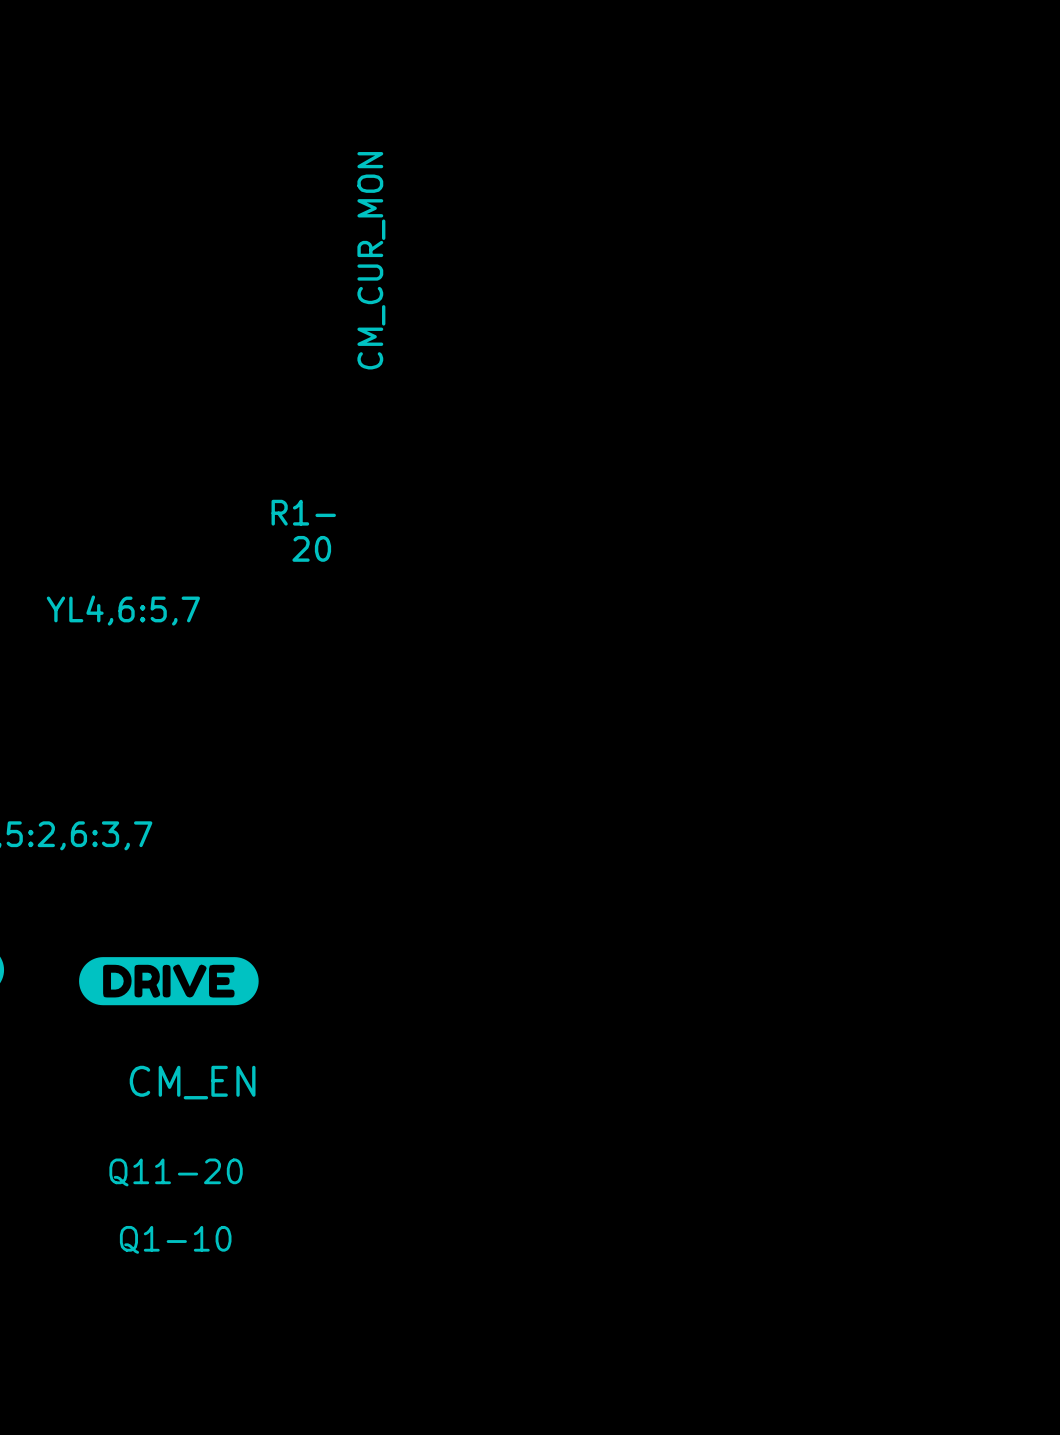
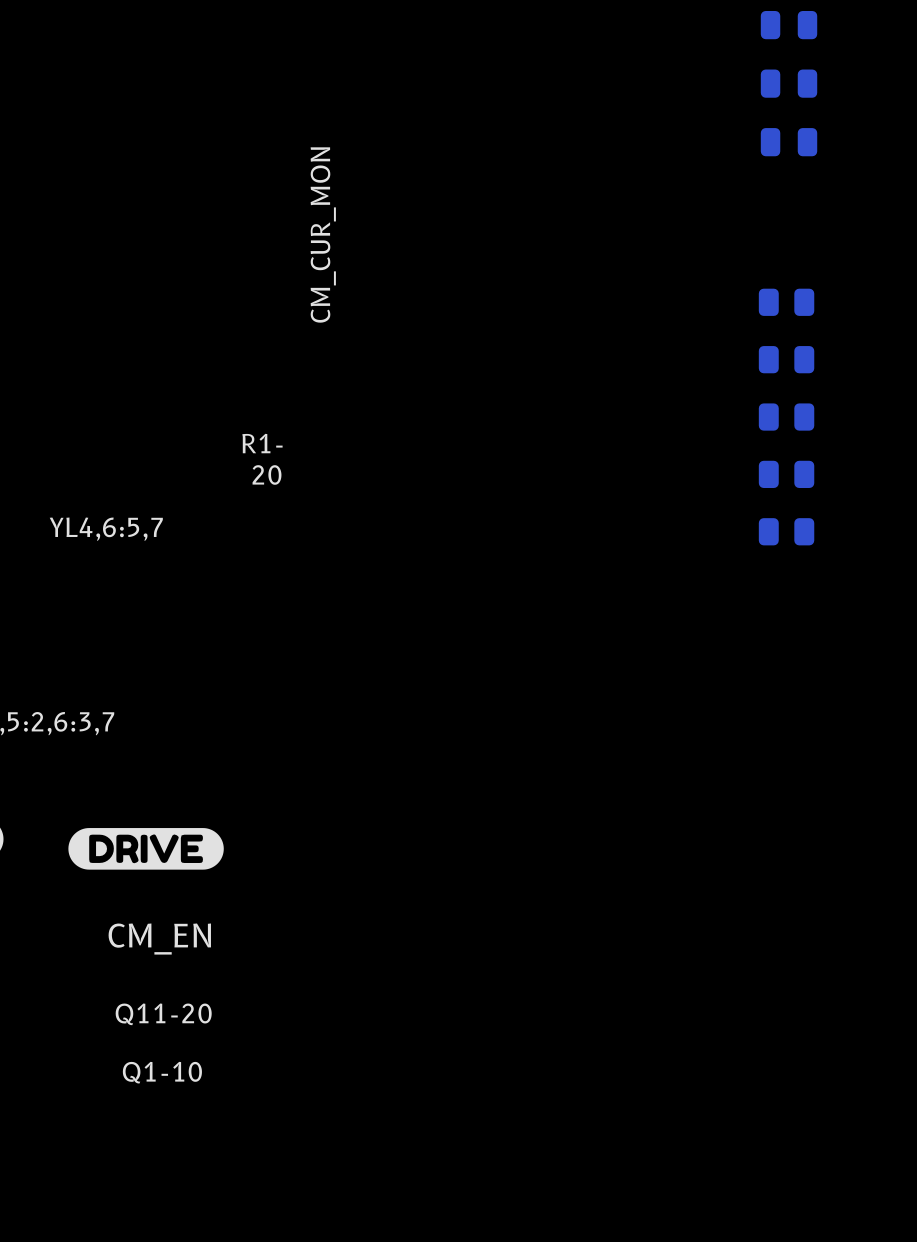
part: none -> (789, 25)
part: none -> (789, 83)
part: none -> (789, 142)
part: none -> (786, 302)
part: none -> (786, 359)
part: none -> (786, 417)
part: none -> (786, 474)
part: none -> (786, 531)

